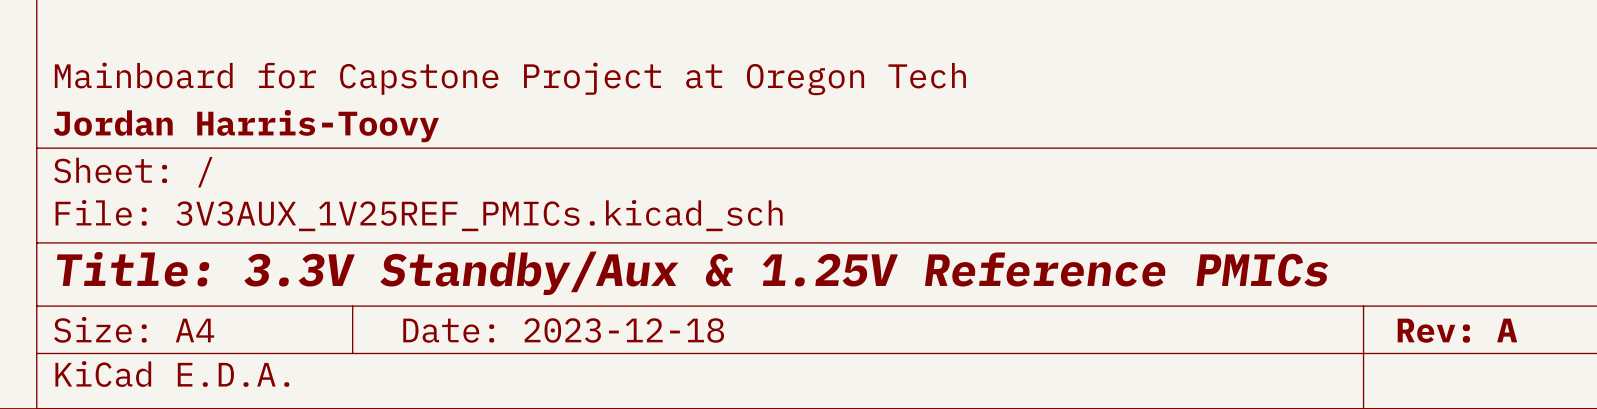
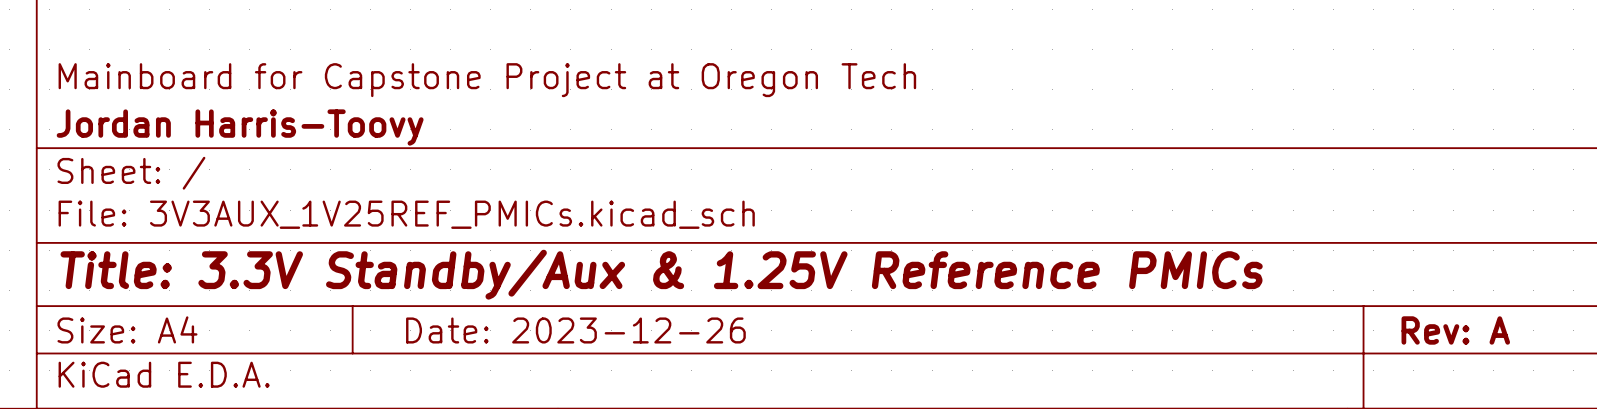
title block: Date: 2023-12-18 (563, 330) -> Date: 2023-12-26 (575, 330)

